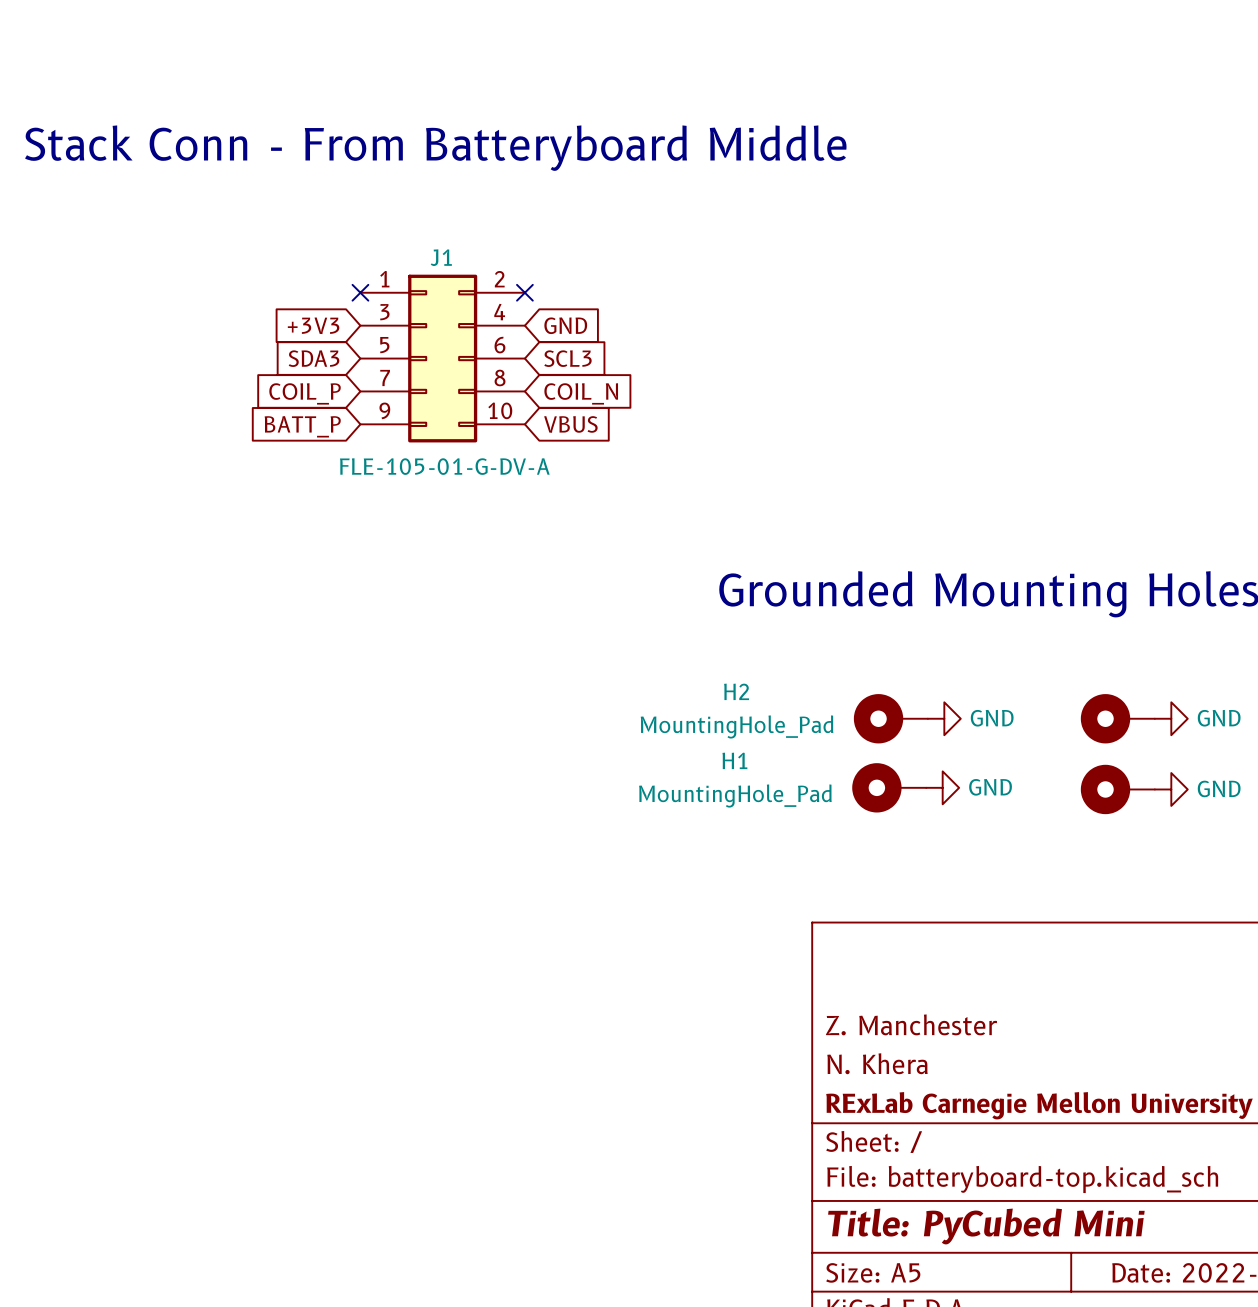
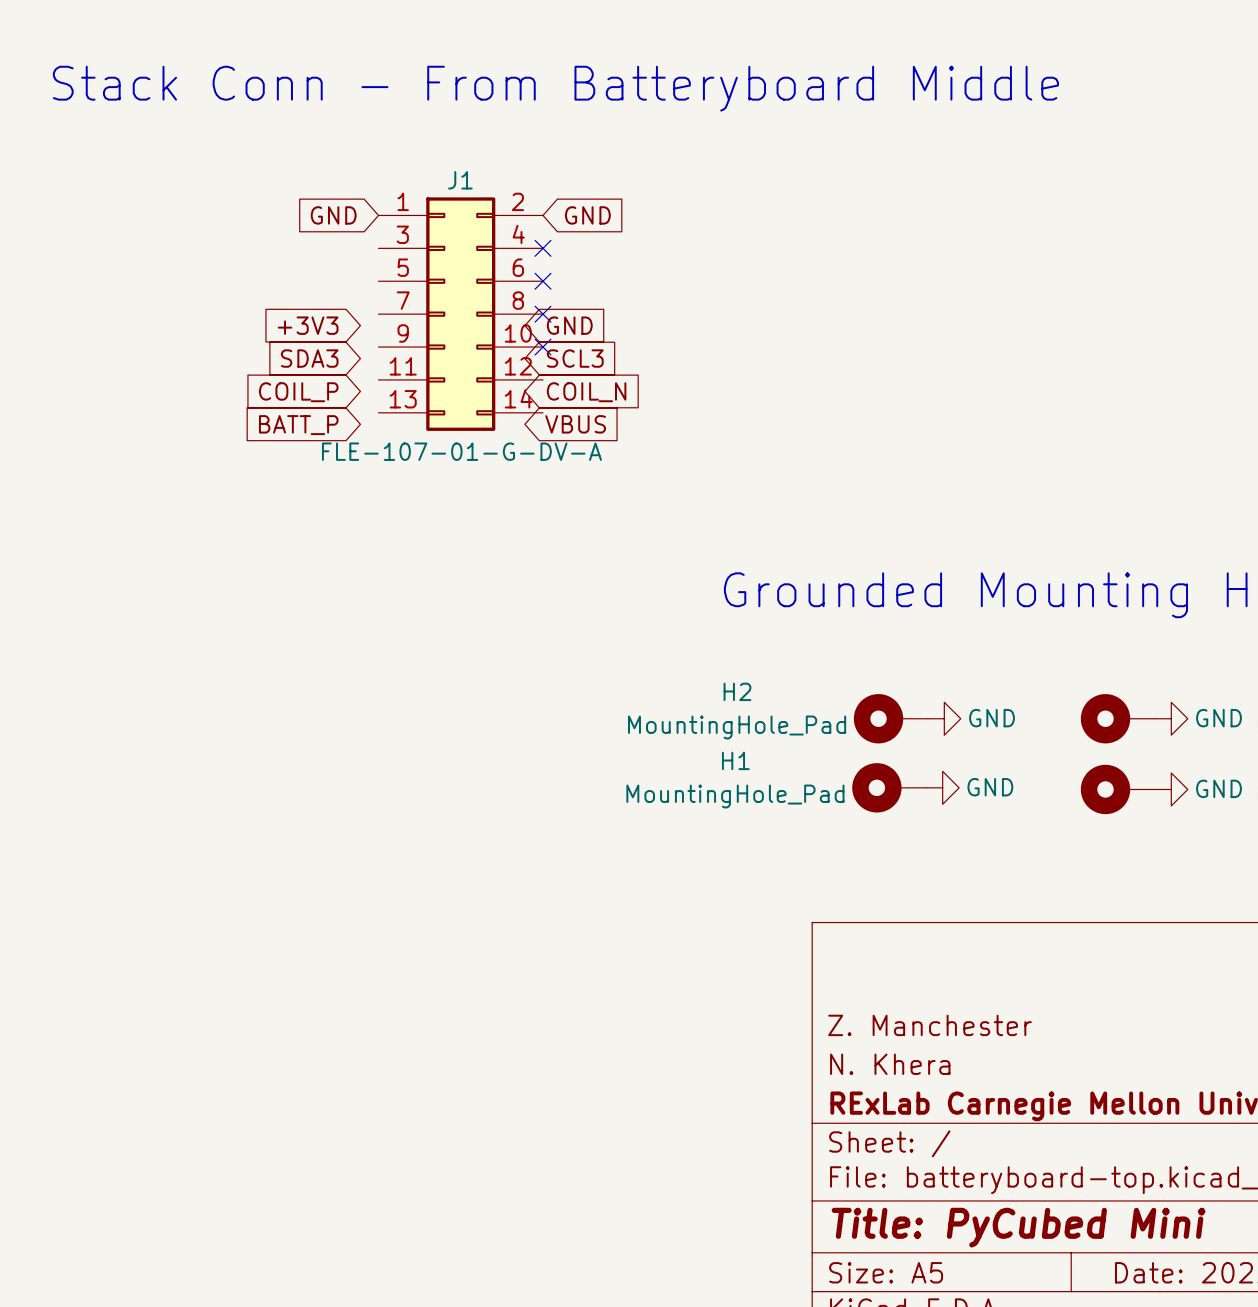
text position: Stack Conn - From Batteryboard Middle (435, 148) -> Stack Conn - From Batteryboard Middle (555, 88)
global label: none -> GND (333, 215)
global label: none -> GND (587, 215)
no-connect mark: none -> (543, 248)
J1 name position: J1 (441, 257) -> J1 (460, 180)
J1 symbol: [360, 274, 525, 443] -> [378, 197, 544, 431]
no-connect mark: none -> (543, 281)
no-connect mark: (360, 292) -> none
no-connect mark: (524, 292) -> none
no-connect mark: none -> (543, 314)
no-connect mark: none -> (543, 347)
J1 value: FLE-105-01-G-DV-A (444, 466) -> FLE-107-01-G-DV-A (461, 451)

